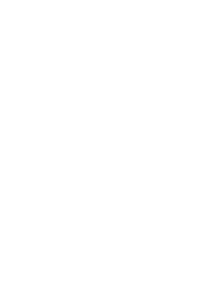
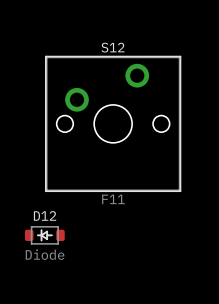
S12: none -> F11 (113, 123)
D12: none -> Diode (44, 235)

